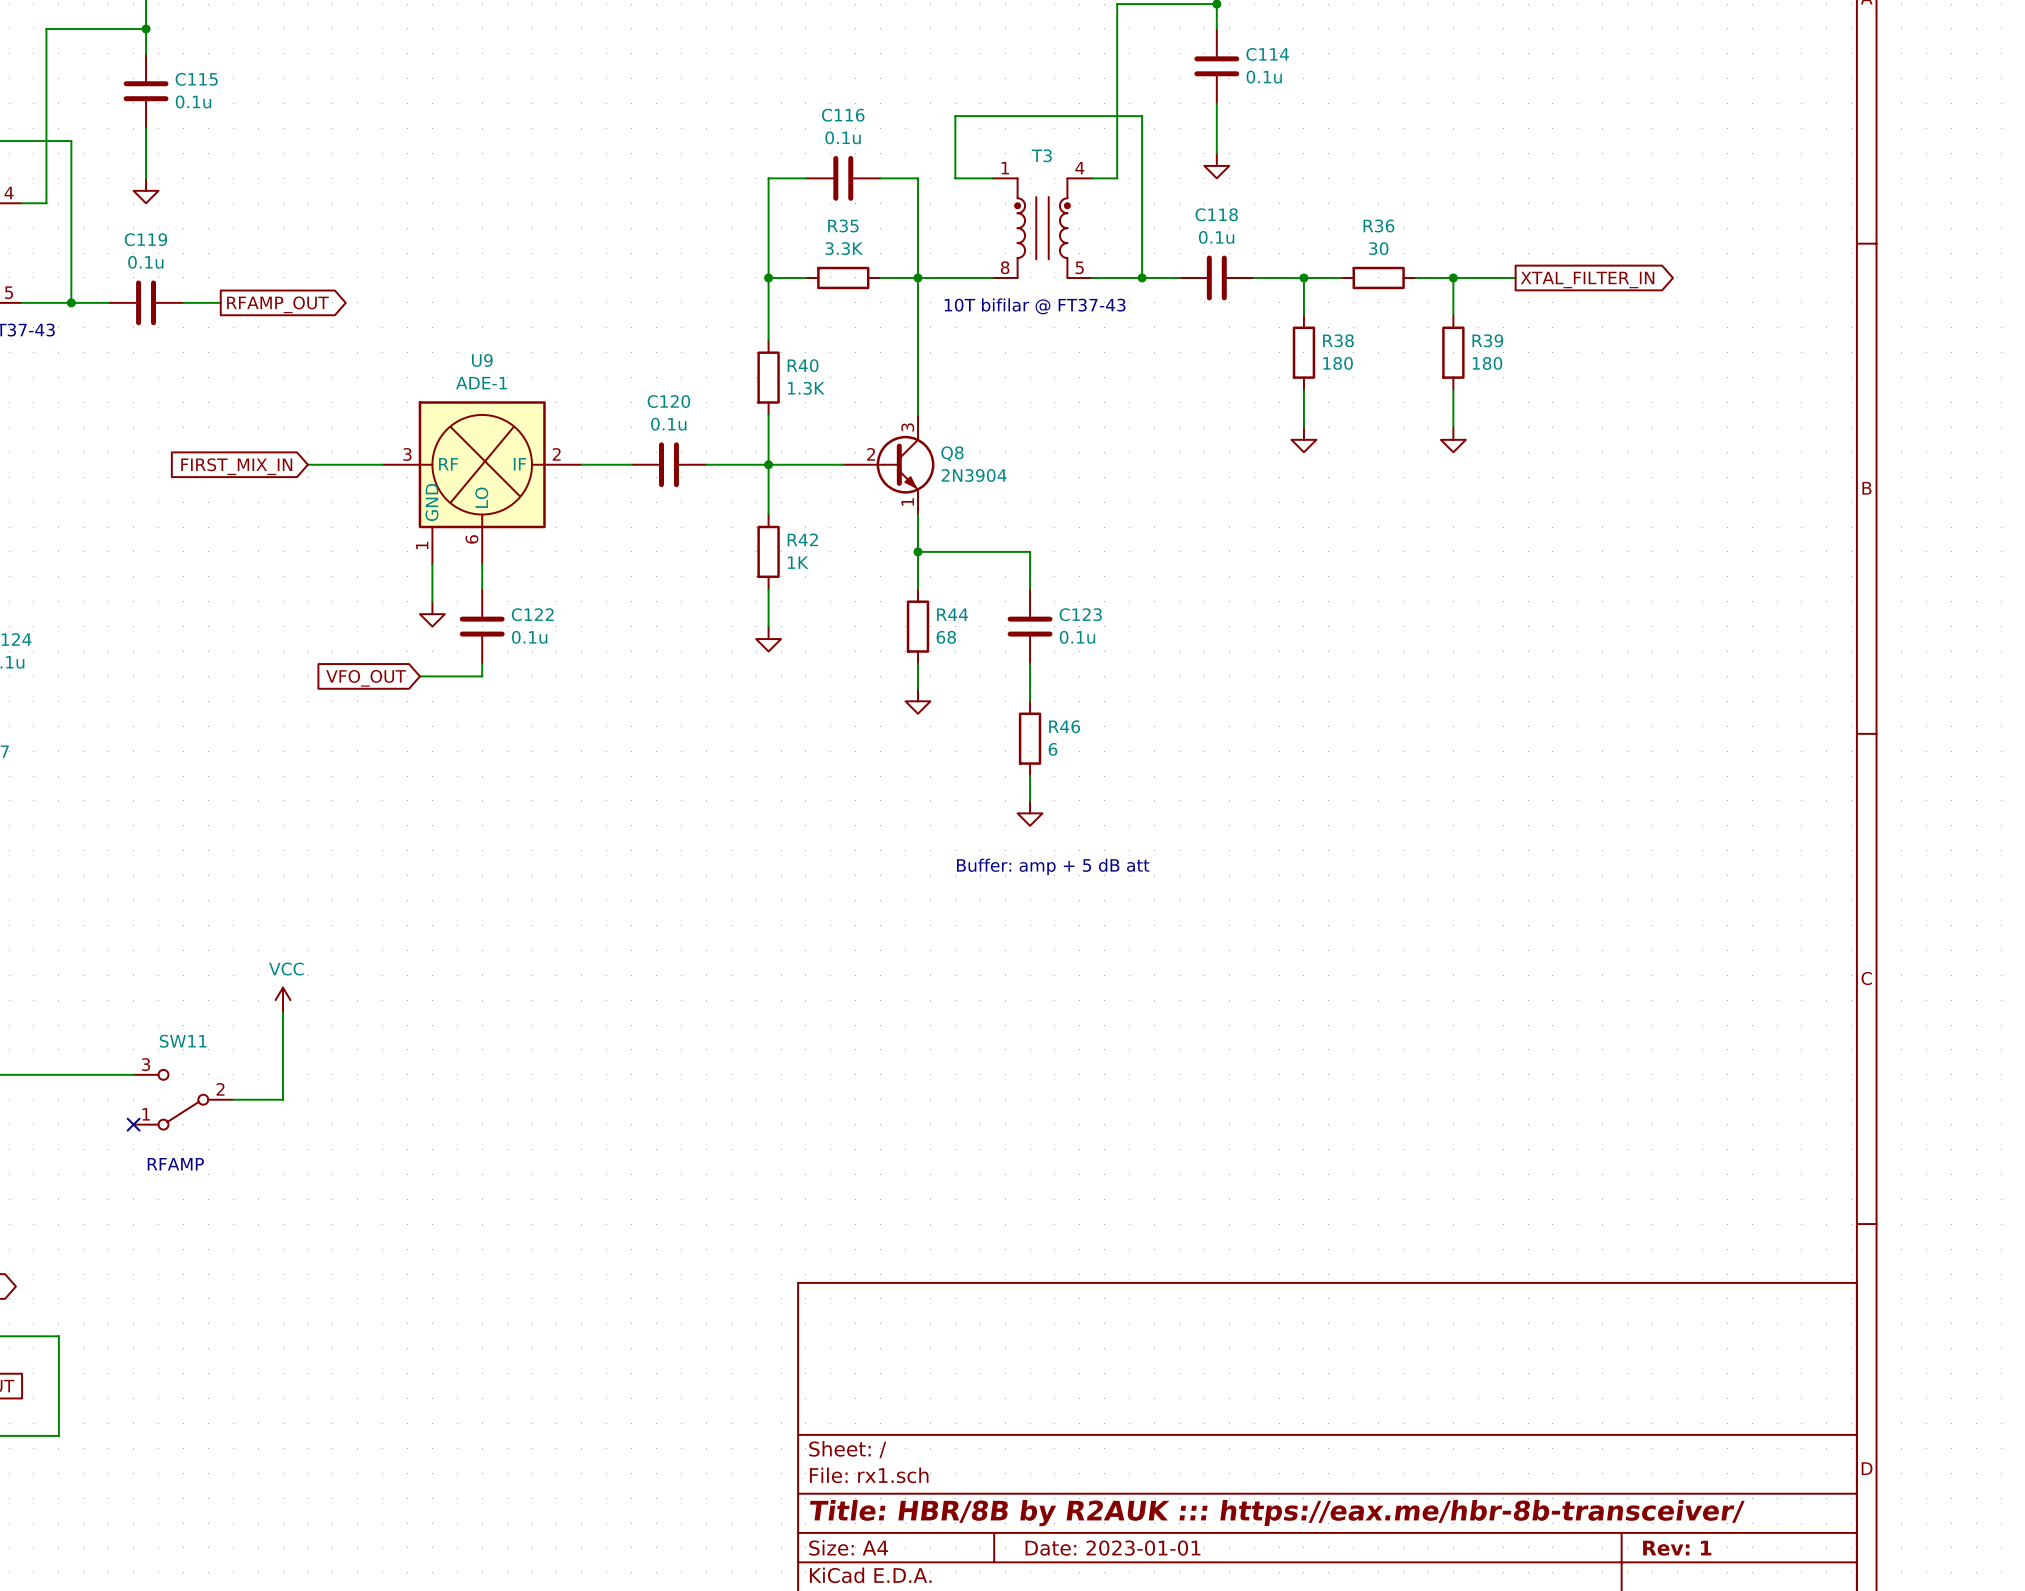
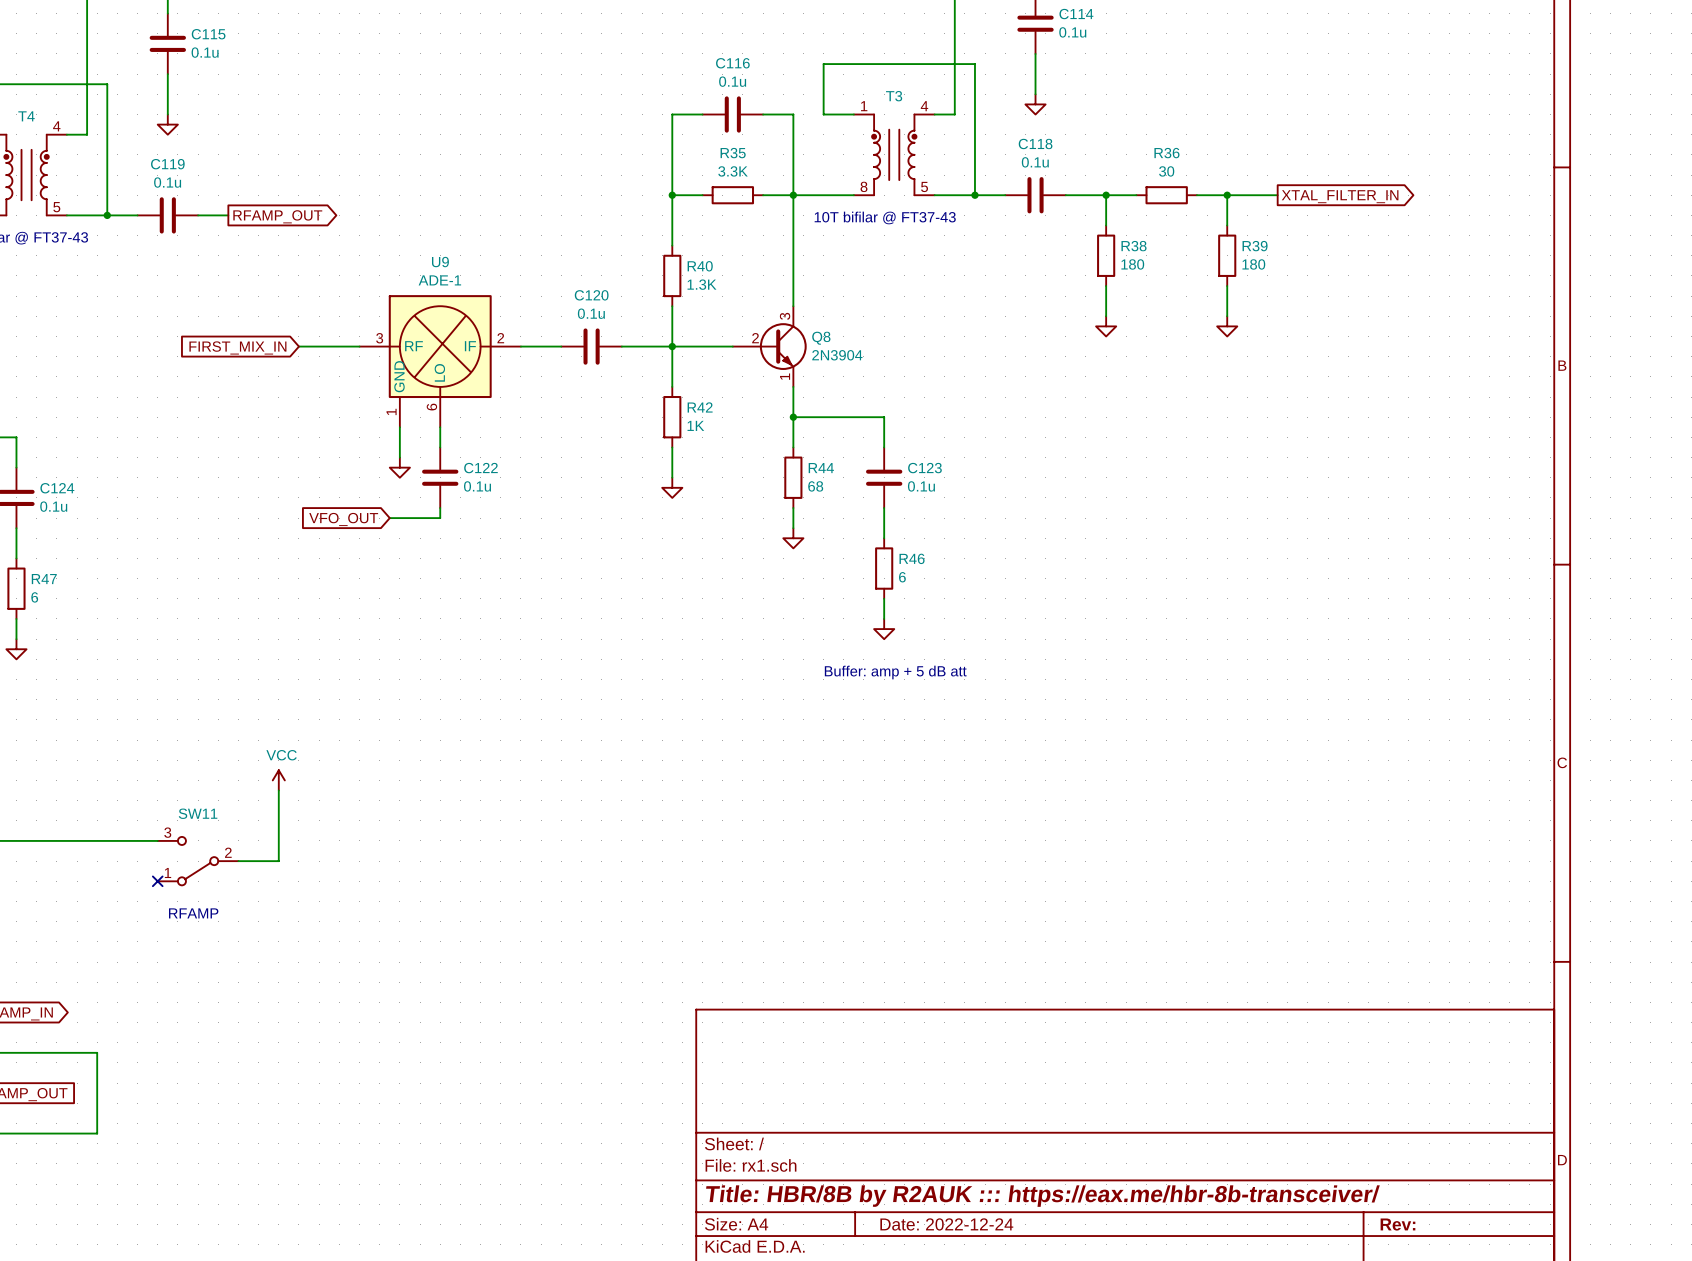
title block: Date: 2023-01-01 (1112, 1548) -> Date: 2022-12-24 (946, 1224)
title block: Rev: 1 (1677, 1548) -> Rev: (1397, 1224)

